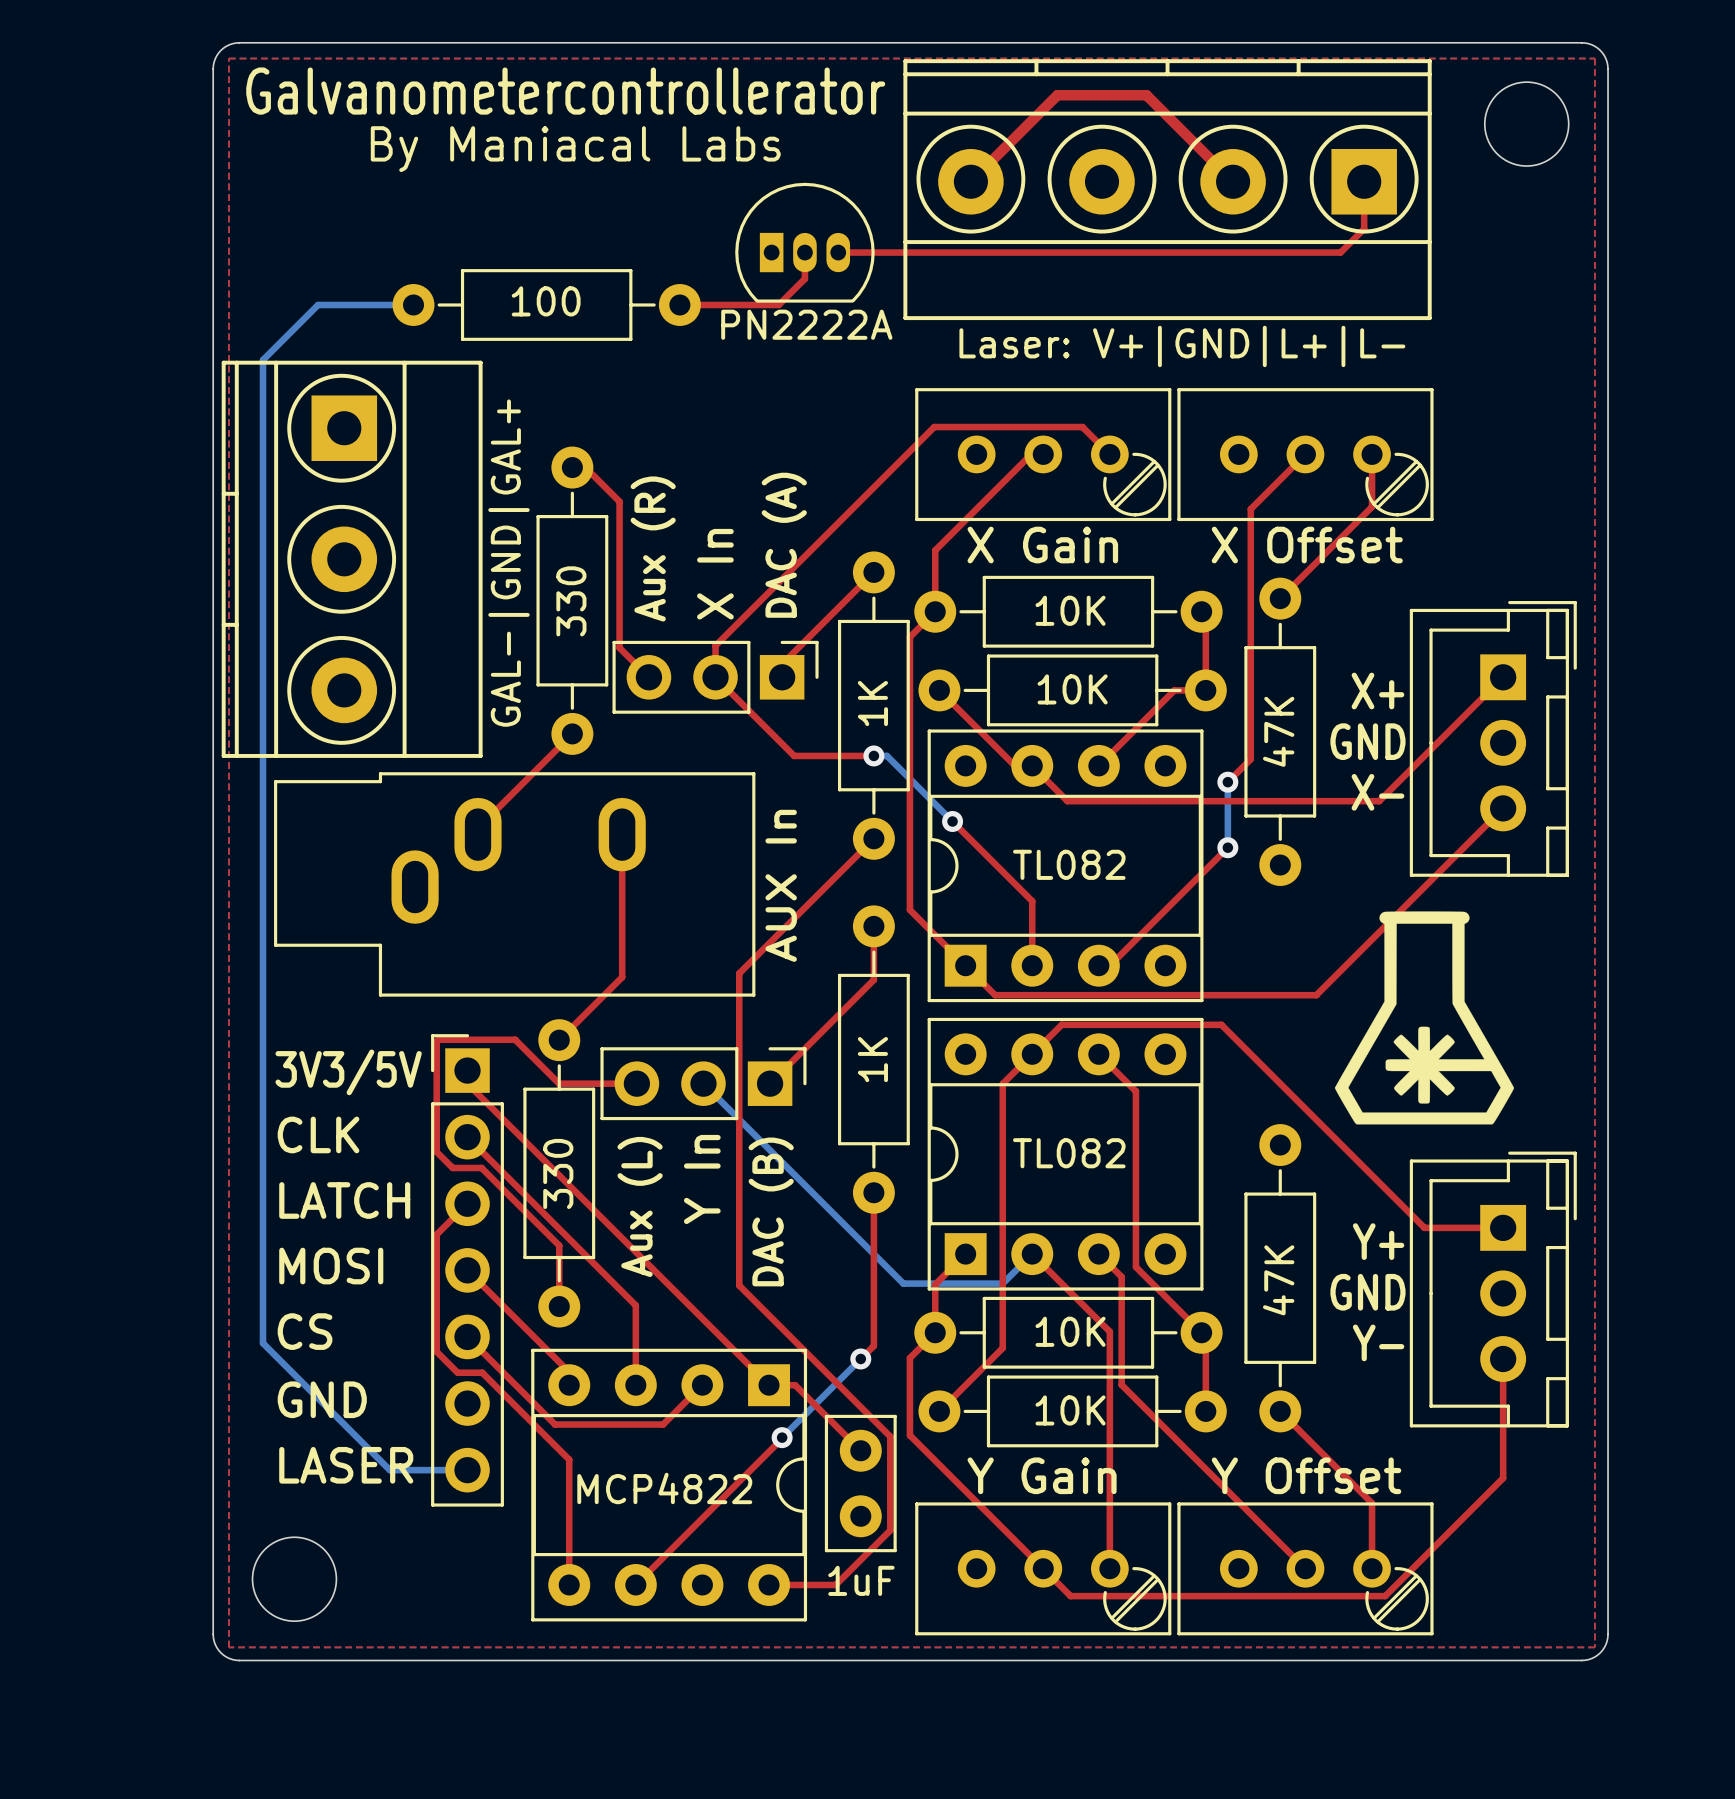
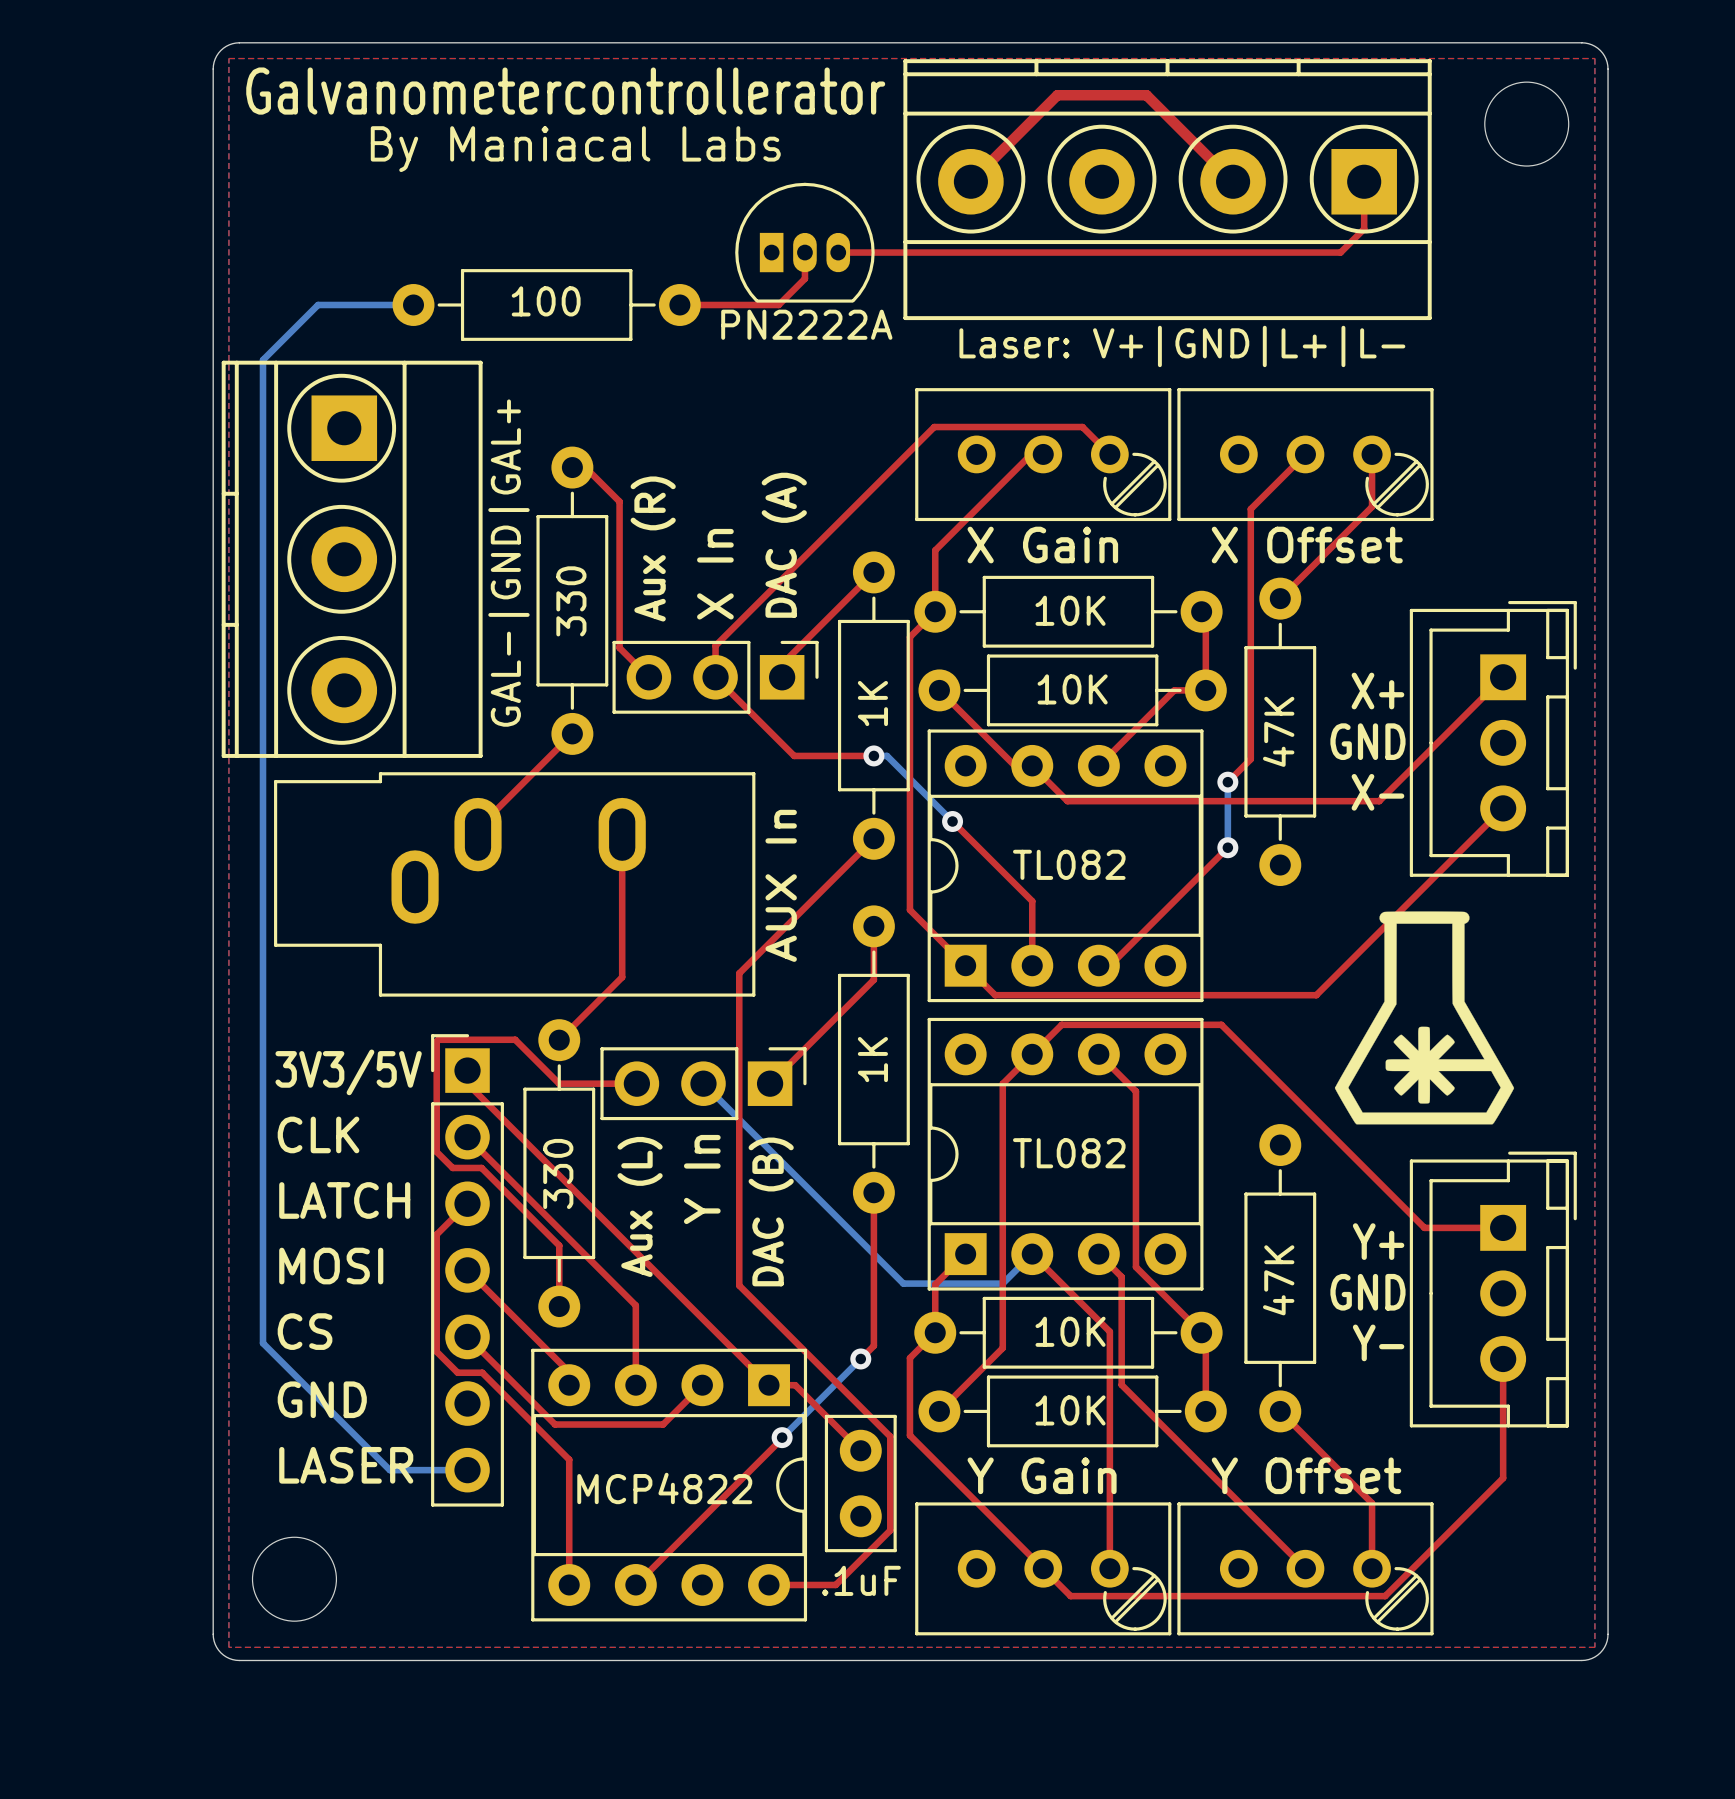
part value: 1uF (861, 1580) -> .1uF (861, 1580)

